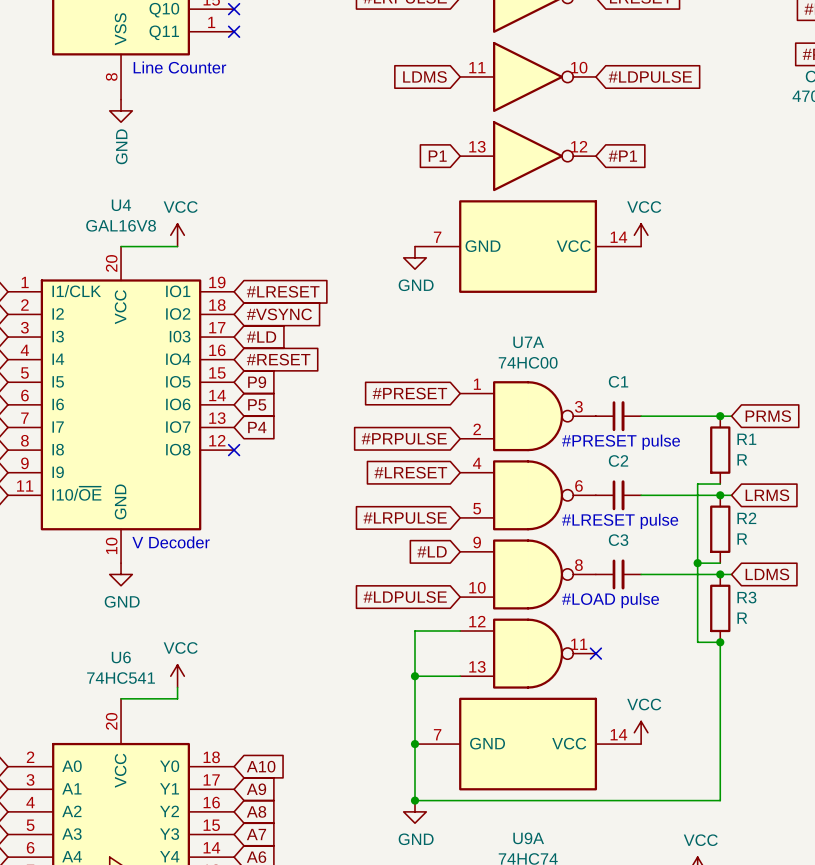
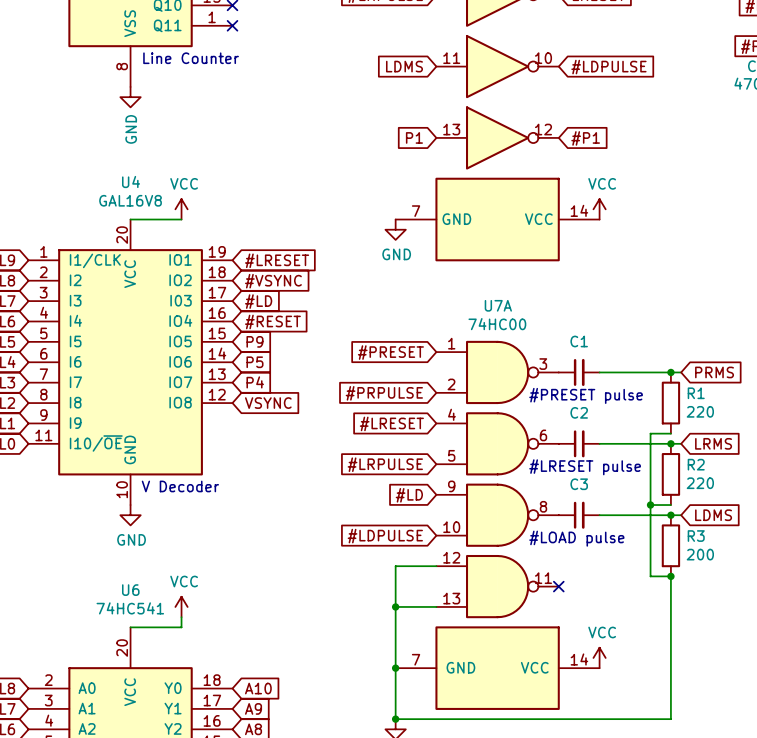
no-connect mark: (234, 450) -> none
global label: none -> VSYNC (268, 403)
R1 value: R (742, 459) -> 220 (700, 411)
R2 value: R (742, 538) -> 220 (700, 483)
R3 value: R (742, 618) -> 200 (700, 554)

